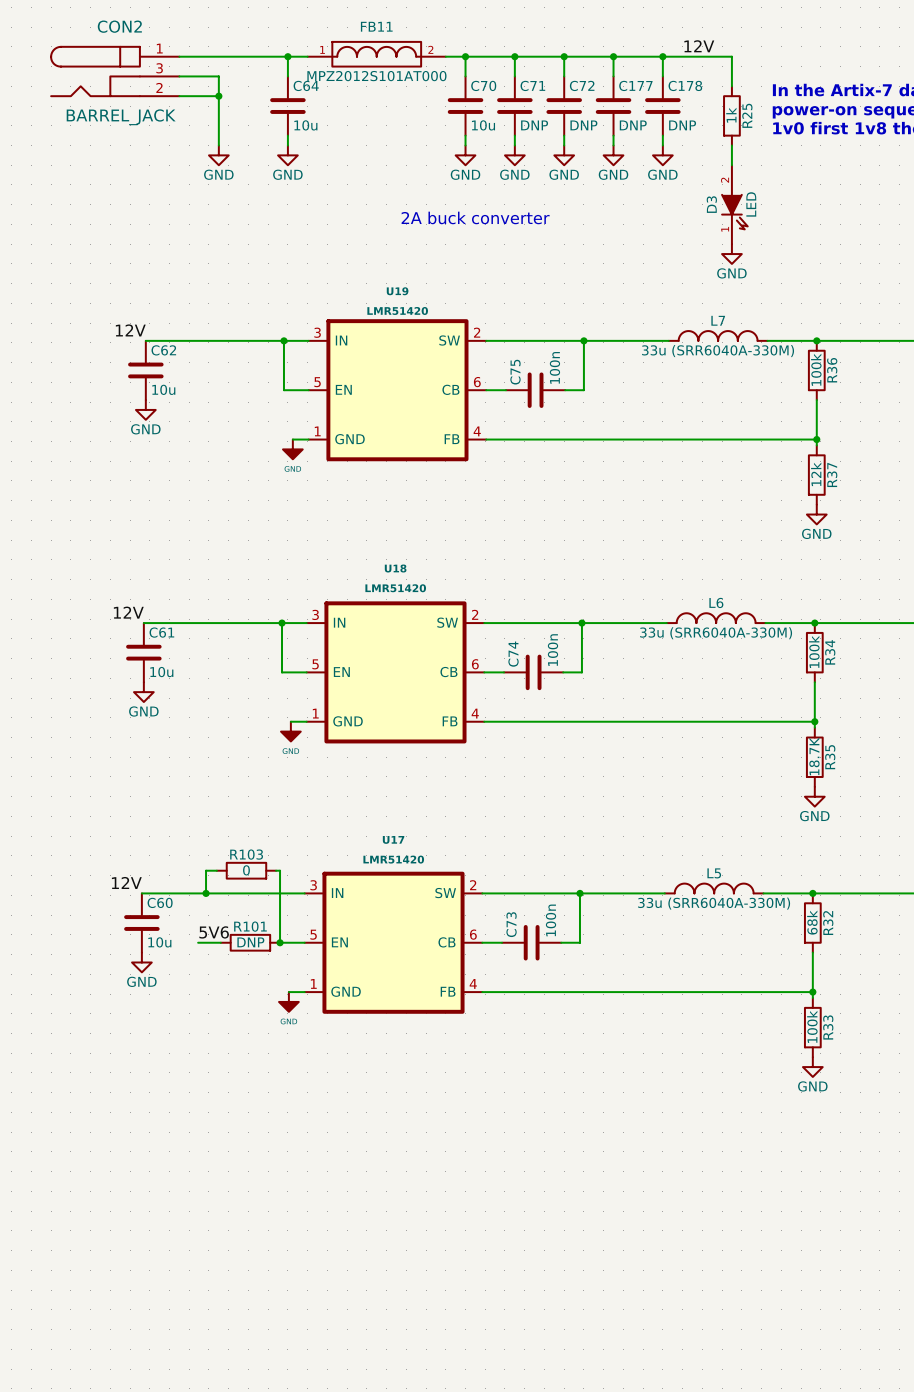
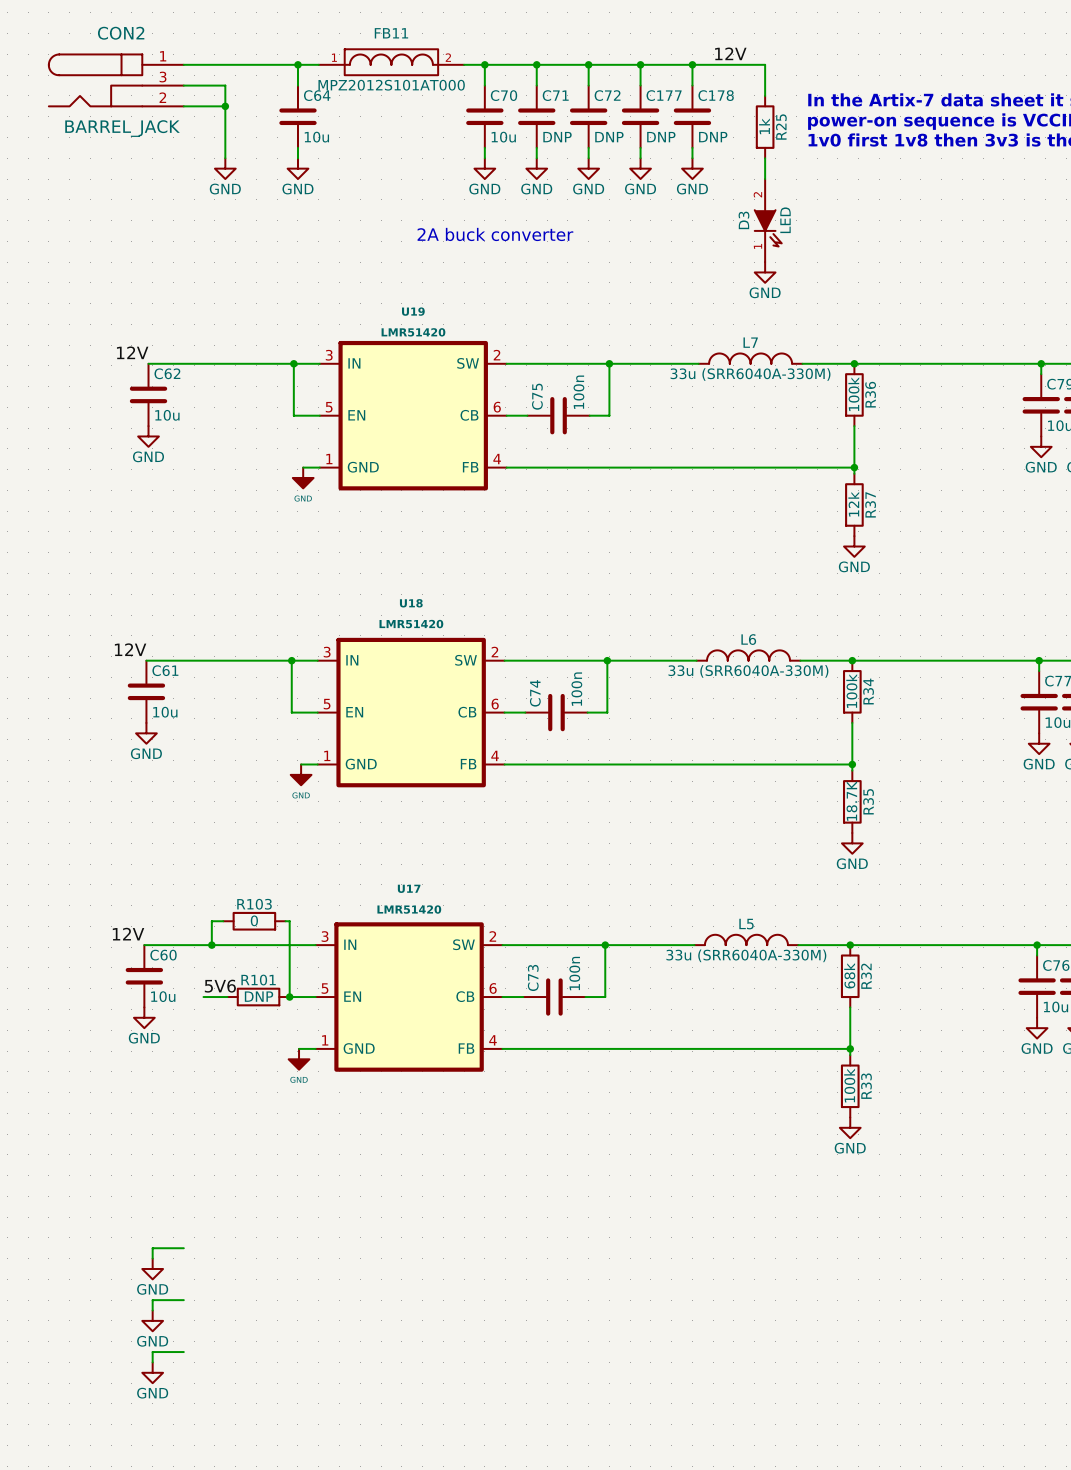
wire: none -> (183, 1248) (152, 1248) (152, 1258)
power symbol: none -> GND (152, 1268)
wire: none -> (183, 1300) (152, 1300) (152, 1310)
power symbol: none -> GND (152, 1320)
wire: none -> (183, 1352) (152, 1352) (152, 1362)
power symbol: none -> GND (152, 1372)

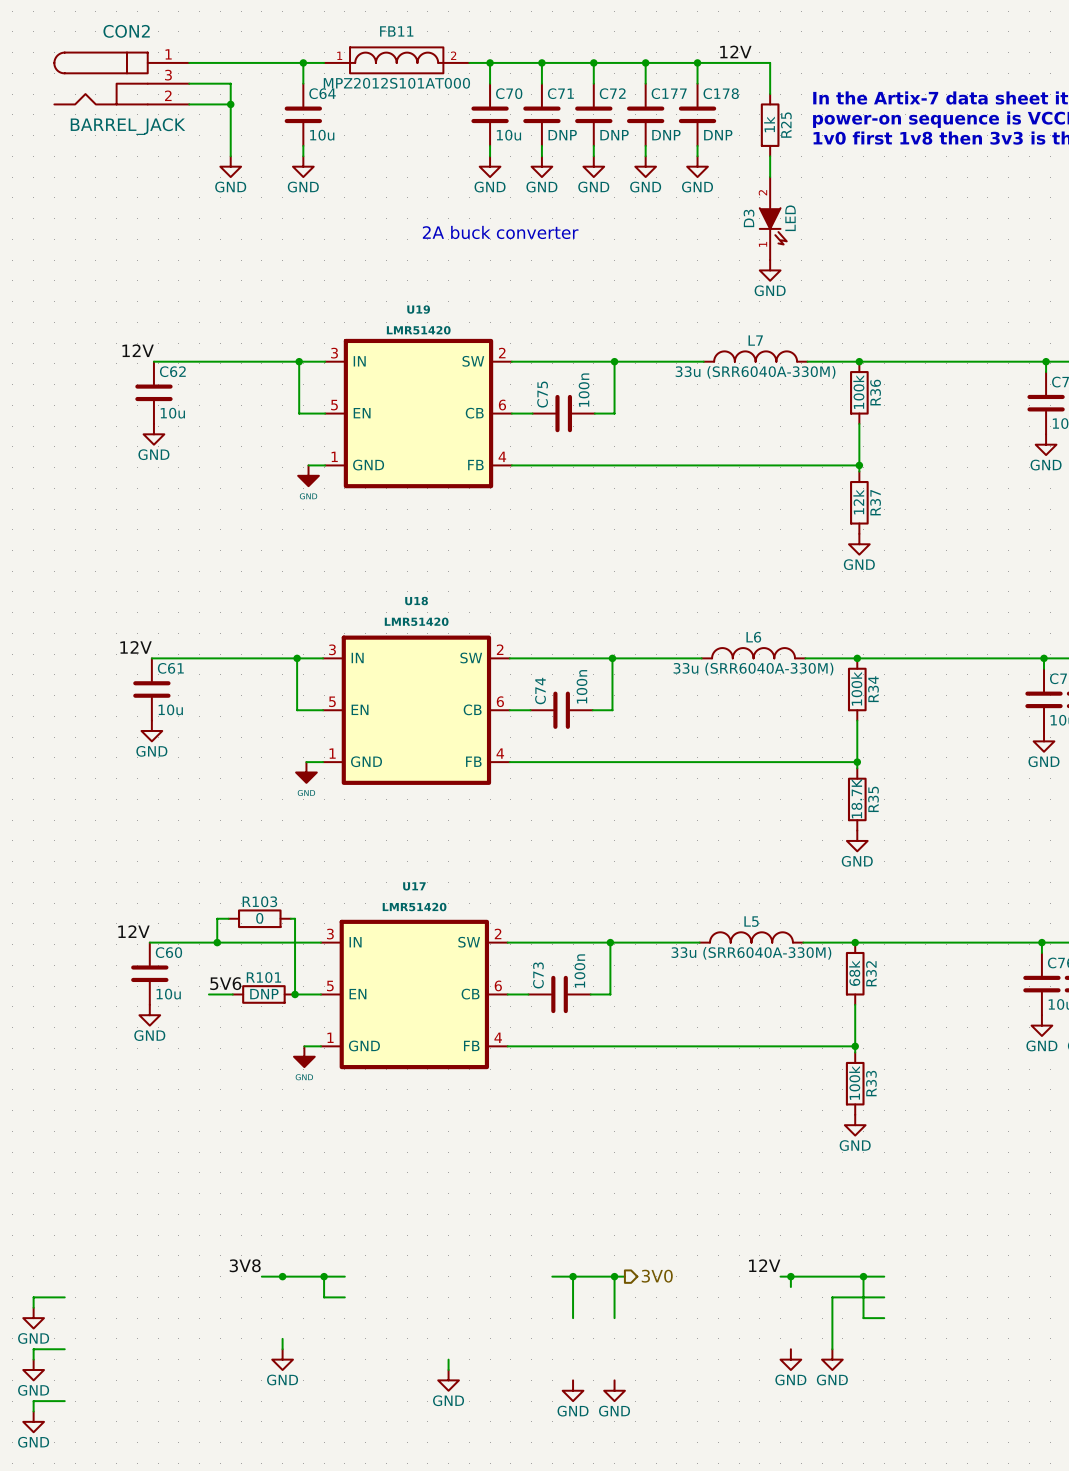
wire: (183, 1248) (152, 1248) (152, 1258) -> (64, 1297) (33, 1297) (33, 1307)
power symbol: GND (152, 1268) -> none
label: none -> 3V8 (245, 1265)
label: none -> 12V (764, 1265)
hierarchical label: none -> 3V0 (657, 1276)
wire: none -> (261, 1276) (344, 1276)
junction: none -> (282, 1276)
wire: none -> (324, 1276) (324, 1297) (344, 1297)
junction: none -> (324, 1276)
wire: none -> (552, 1276) (624, 1276)
wire: none -> (573, 1276) (573, 1318)
junction: none -> (573, 1276)
wire: none -> (614, 1276) (614, 1318)
junction: none -> (614, 1276)
wire: none -> (780, 1276) (884, 1276)
wire: none -> (790, 1276) (790, 1287)
junction: none -> (790, 1276)
wire: none -> (863, 1276) (863, 1318) (884, 1318)
junction: none -> (863, 1276)
wire: (183, 1300) (152, 1300) (152, 1310) -> (64, 1349) (33, 1349) (33, 1359)
wire: none -> (884, 1297) (832, 1297) (832, 1349)
power symbol: none -> GND (33, 1318)
power symbol: GND (152, 1320) -> none
wire: none -> (282, 1338) (282, 1349)
wire: (183, 1352) (152, 1352) (152, 1362) -> (64, 1401) (33, 1401) (33, 1411)
power symbol: none -> GND (282, 1359)
wire: none -> (448, 1359) (448, 1370)
power symbol: none -> GND (790, 1359)
power symbol: none -> GND (832, 1359)
power symbol: none -> GND (33, 1370)
power symbol: GND (152, 1372) -> none
power symbol: none -> GND (448, 1380)
power symbol: none -> GND (573, 1390)
power symbol: none -> GND (614, 1390)
power symbol: none -> GND (33, 1421)

